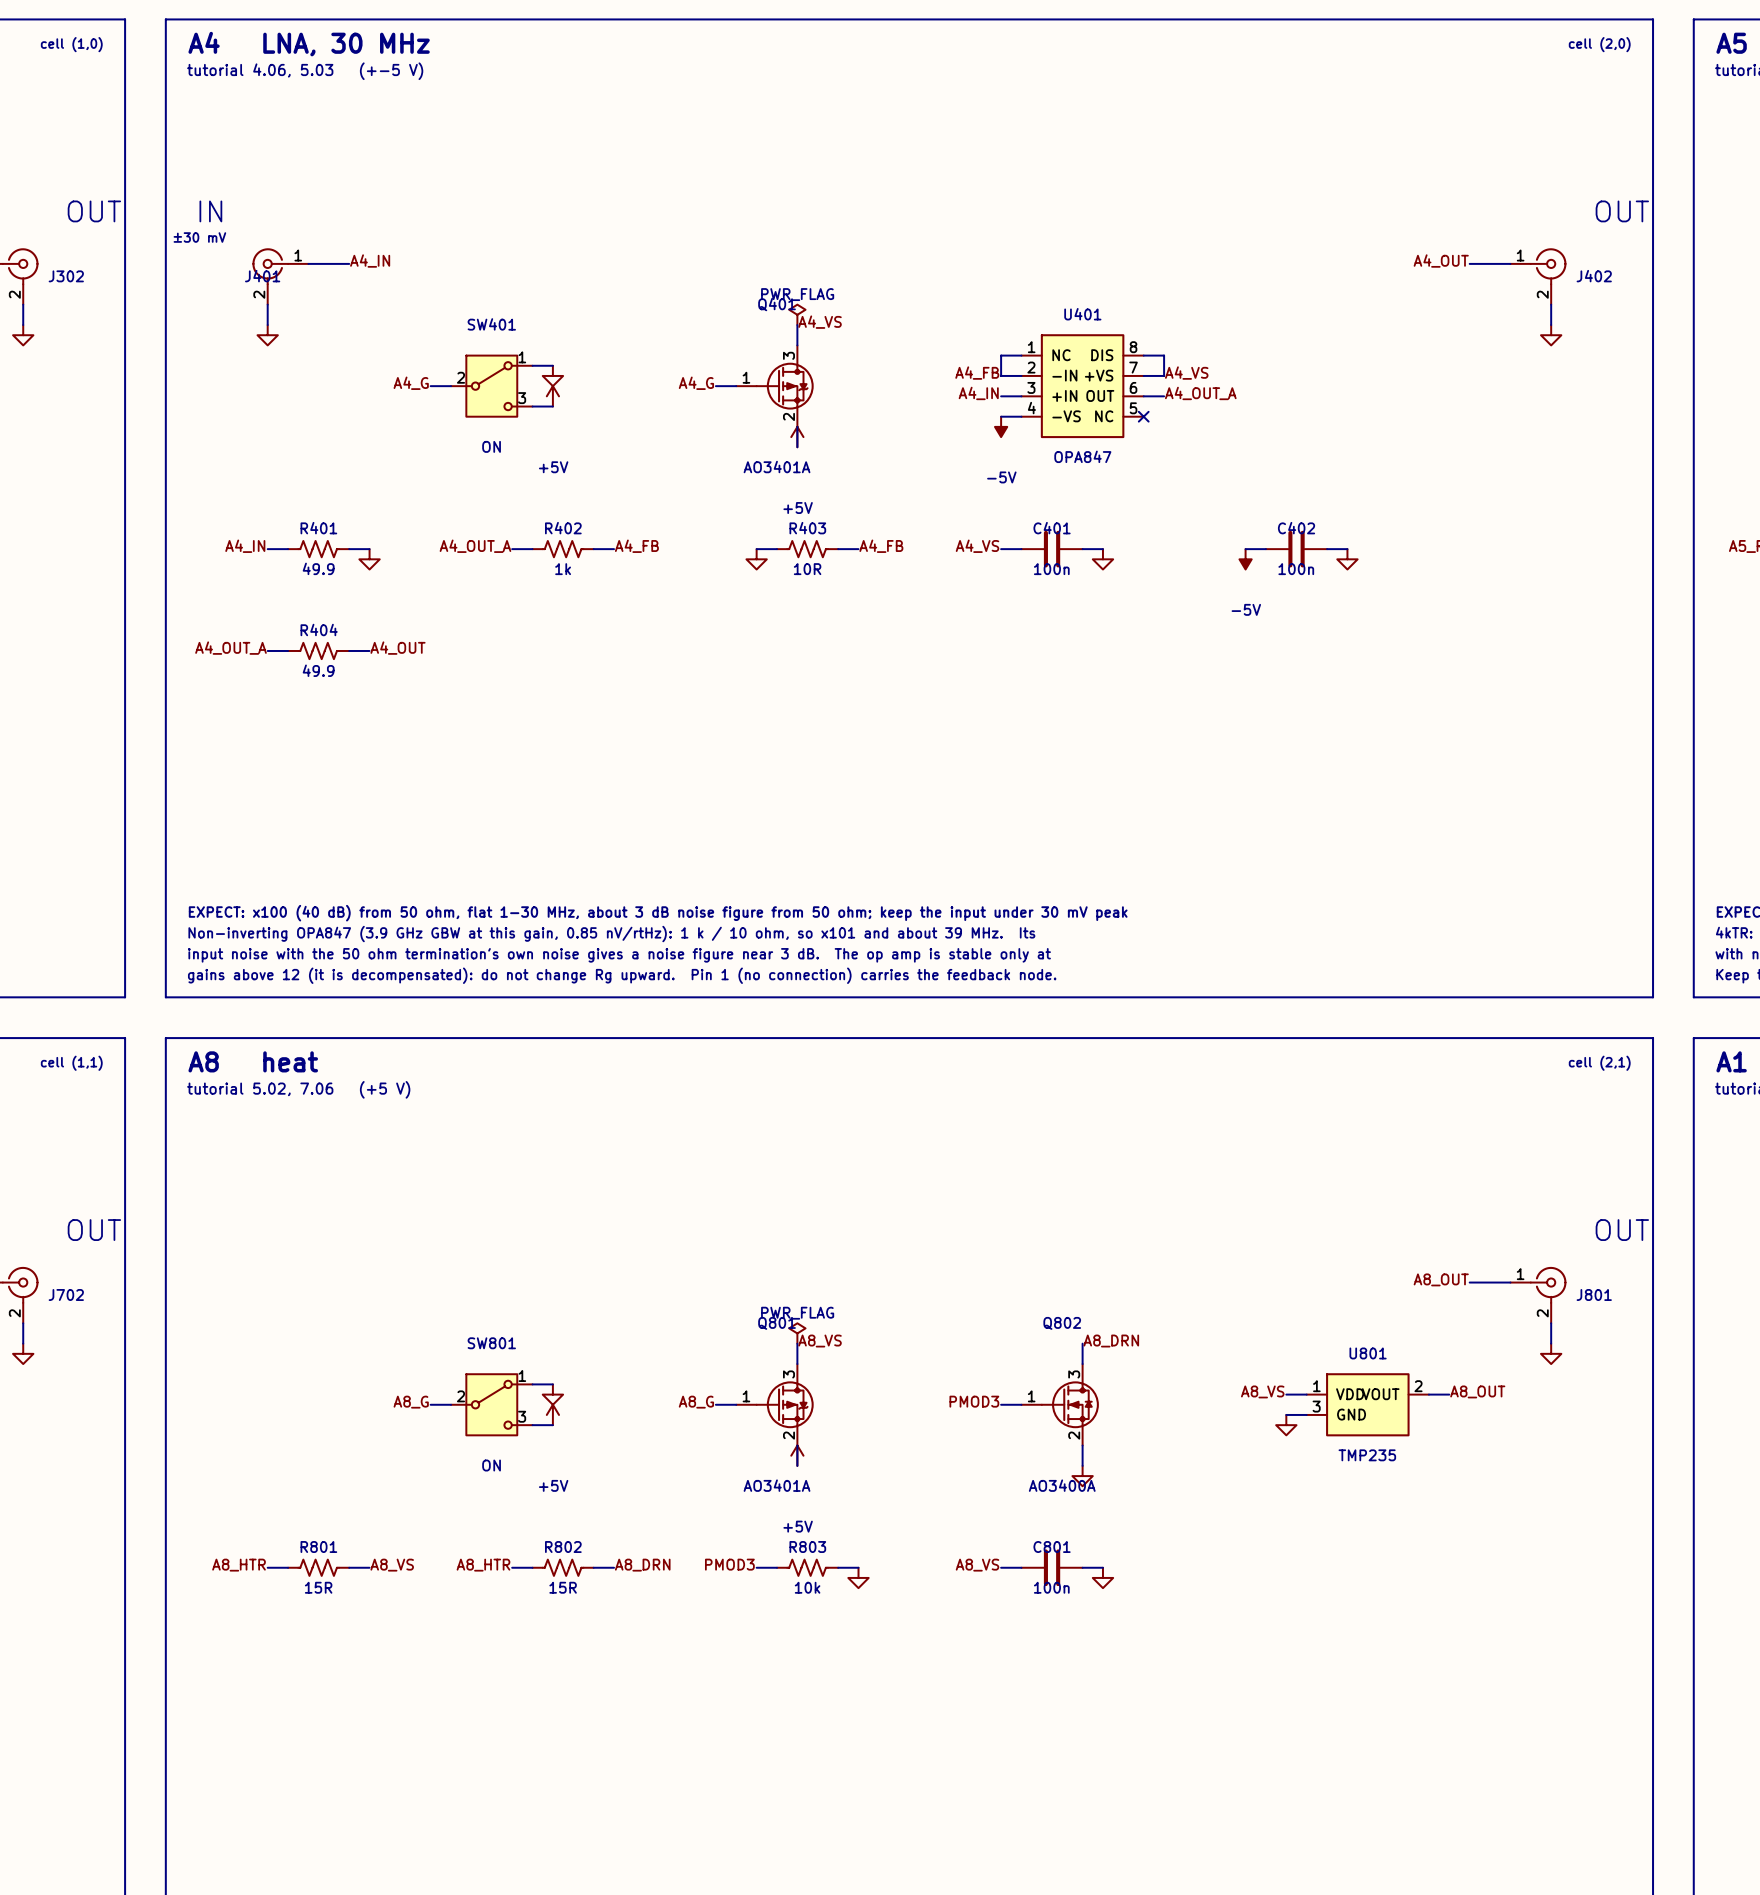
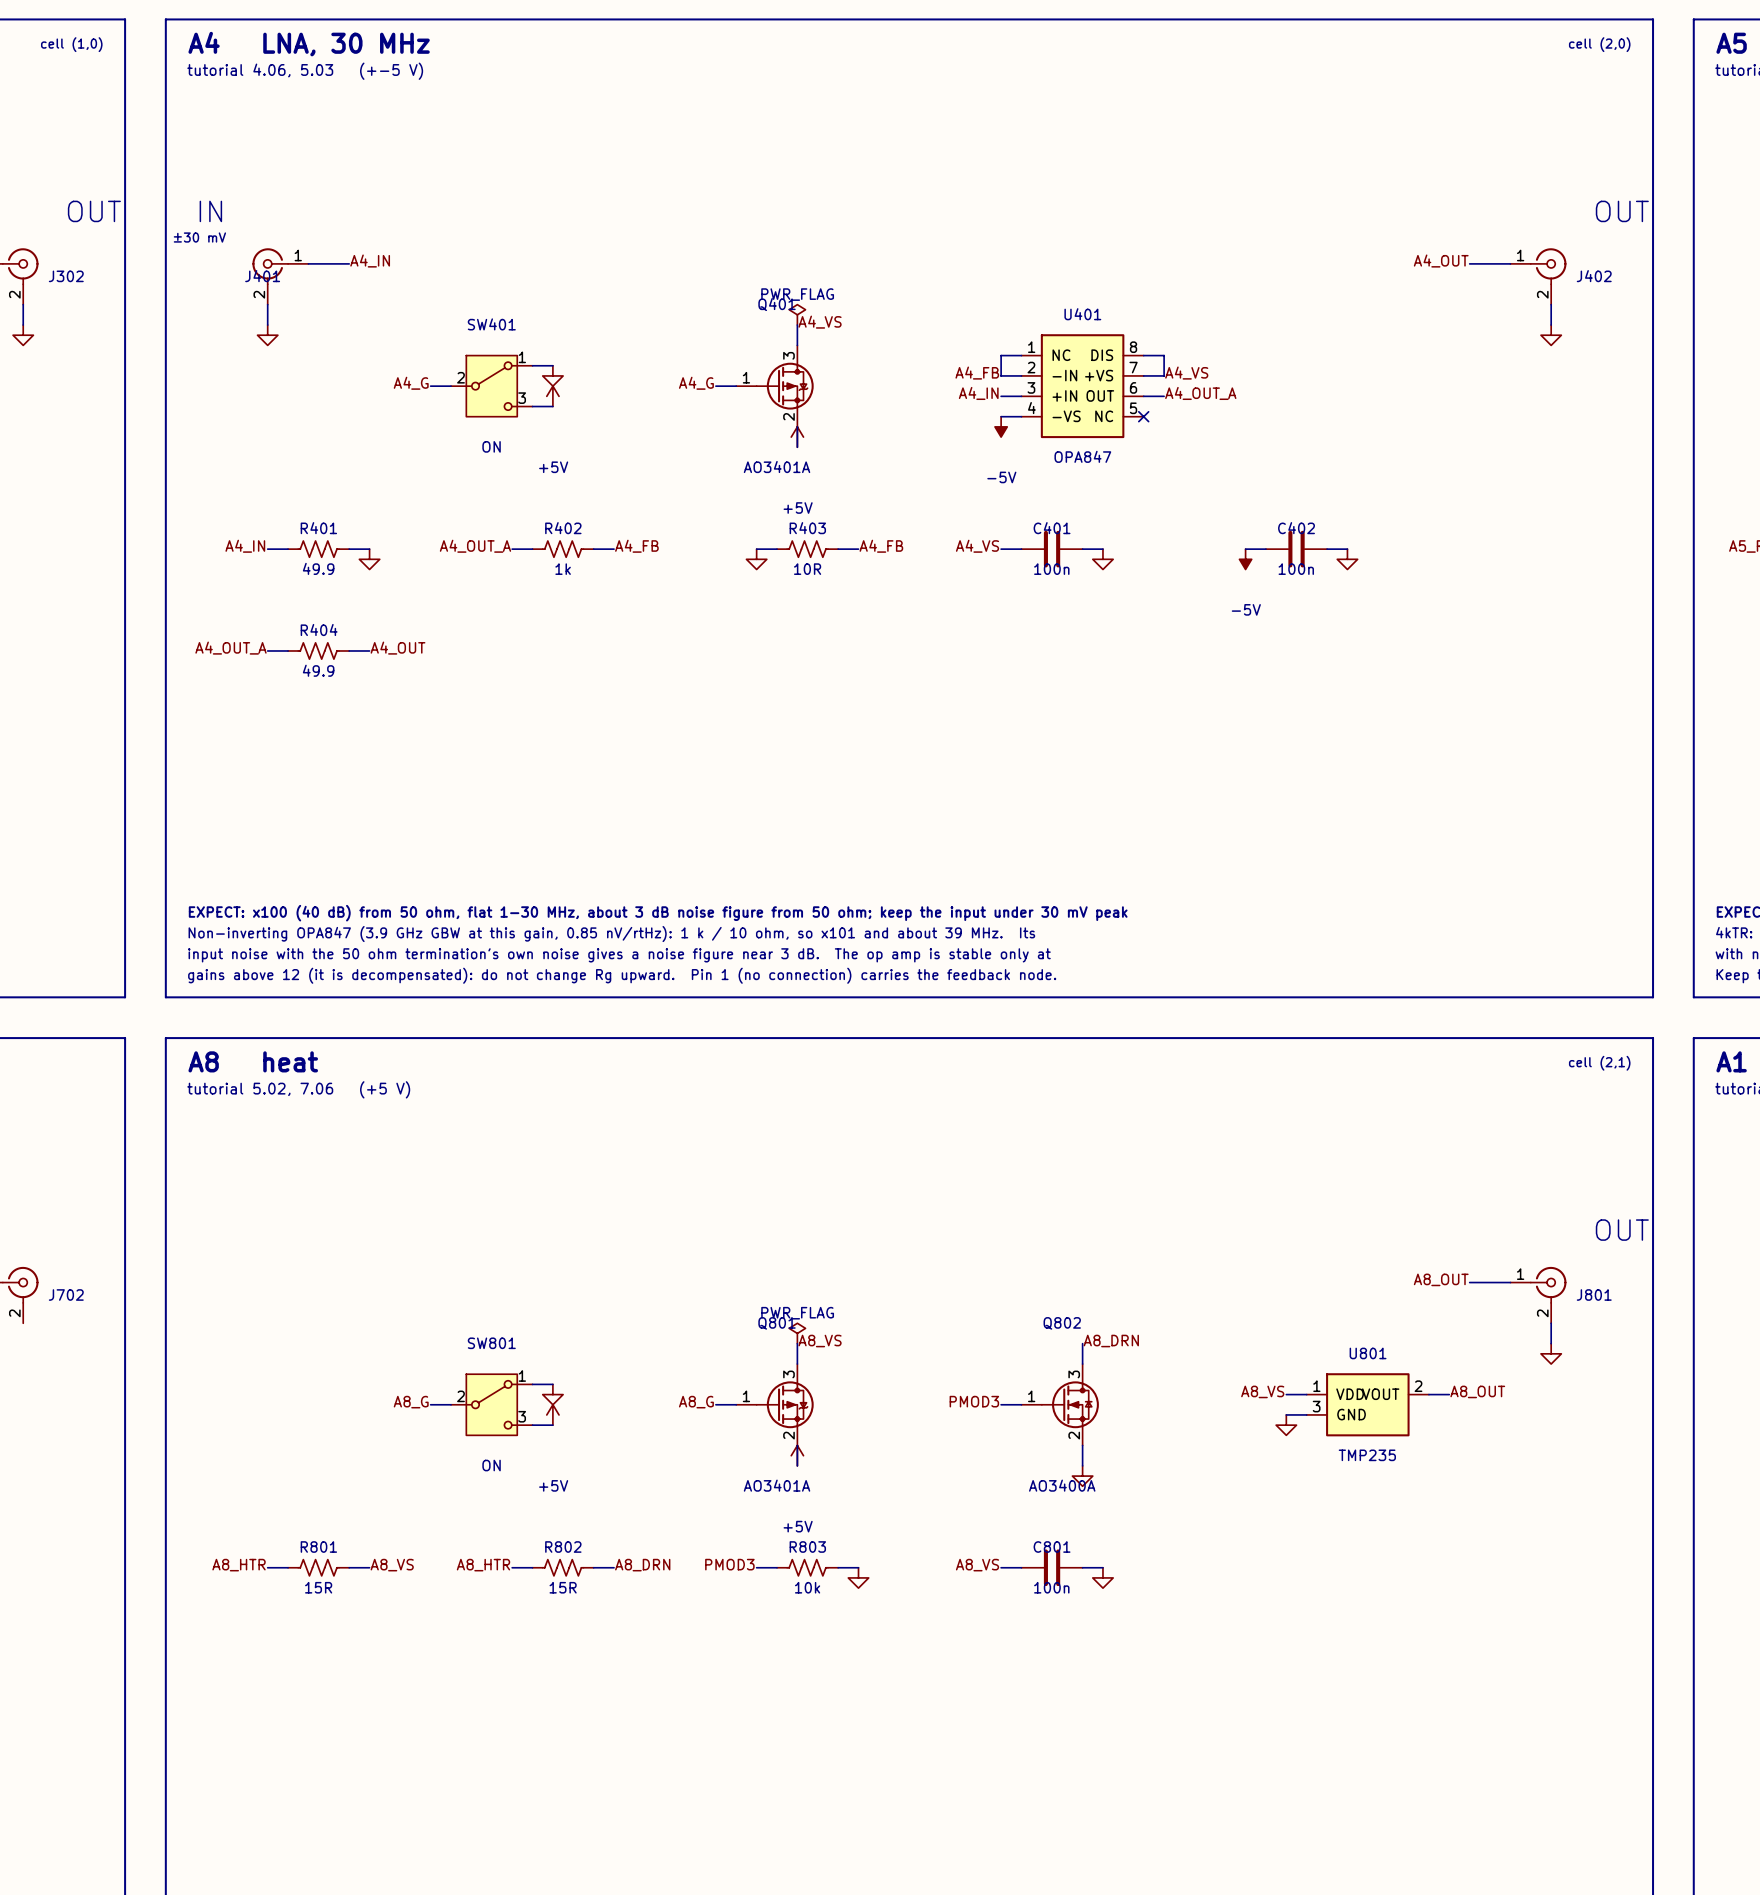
text: cell (1,1) (71, 1063) -> none
text: OUT (94, 1230) -> none
wire: (23, 1323) (23, 1343) -> none
power symbol: (23, 1353) -> none

